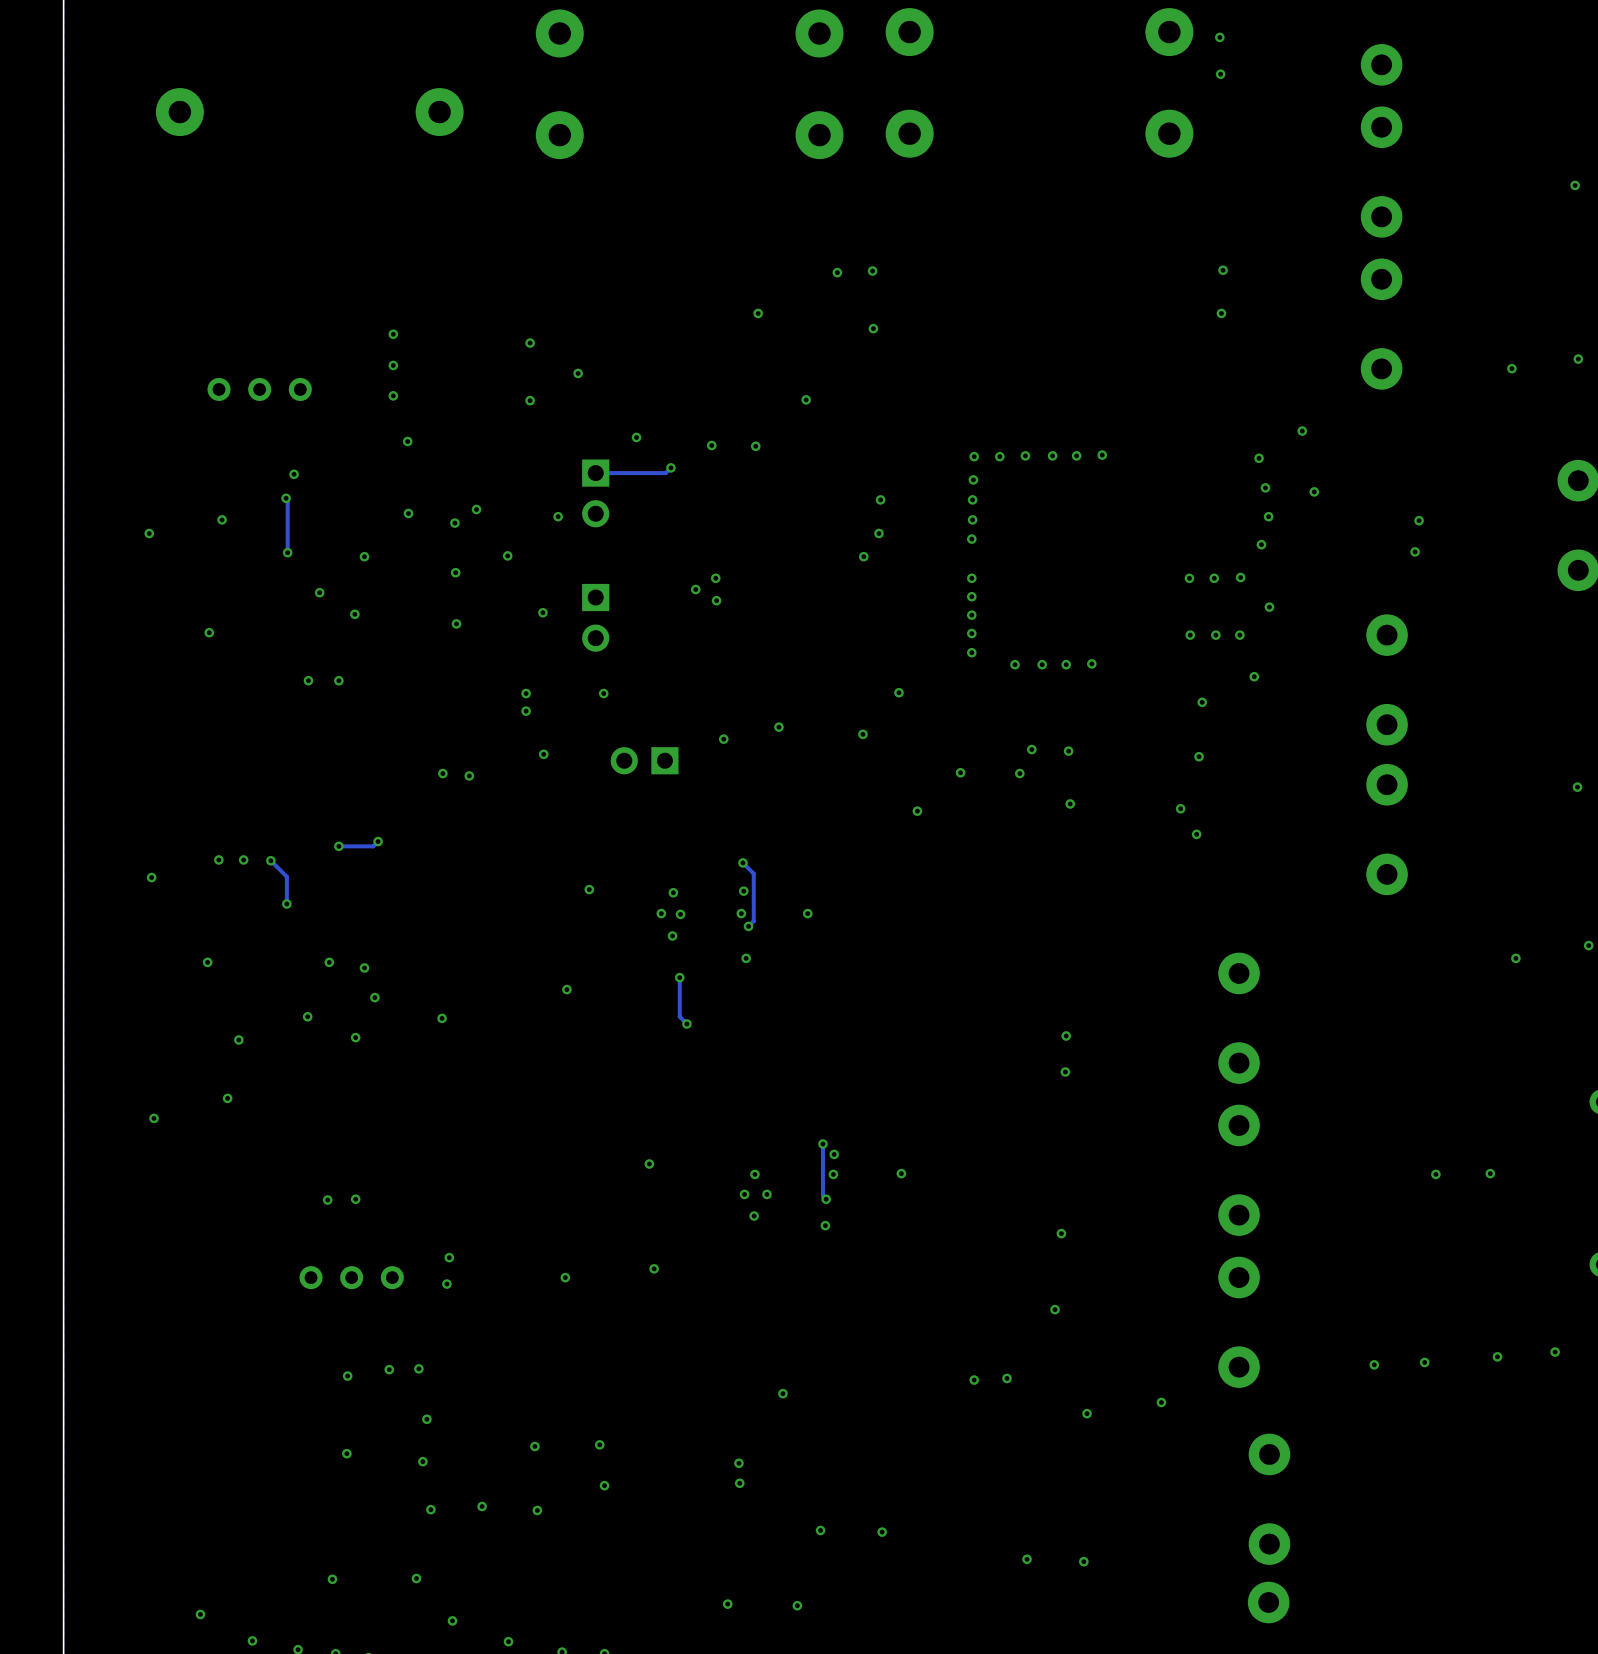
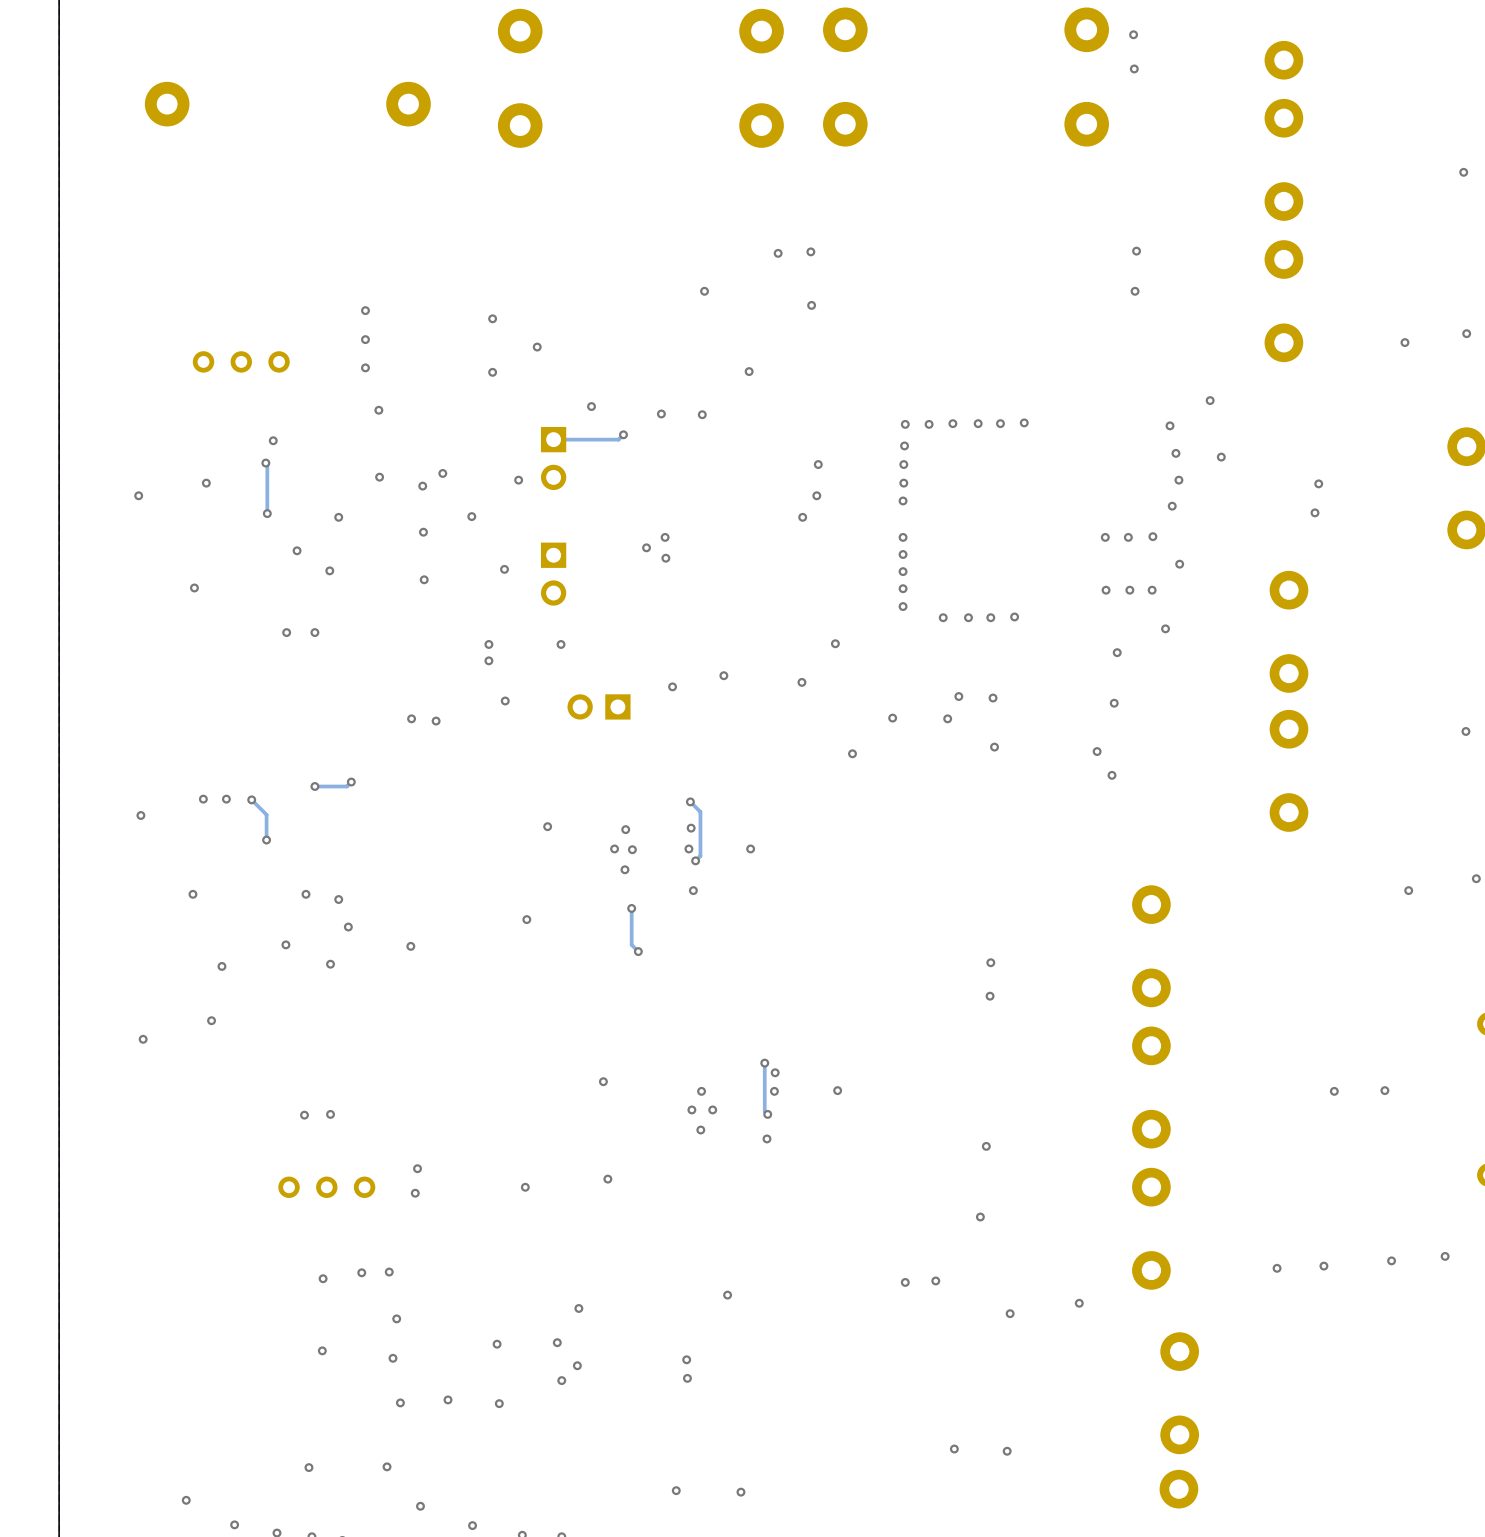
via: none -> (578, 1308)
via: none -> (577, 1365)
via: (820, 1530) -> none
via: (882, 1532) -> none

